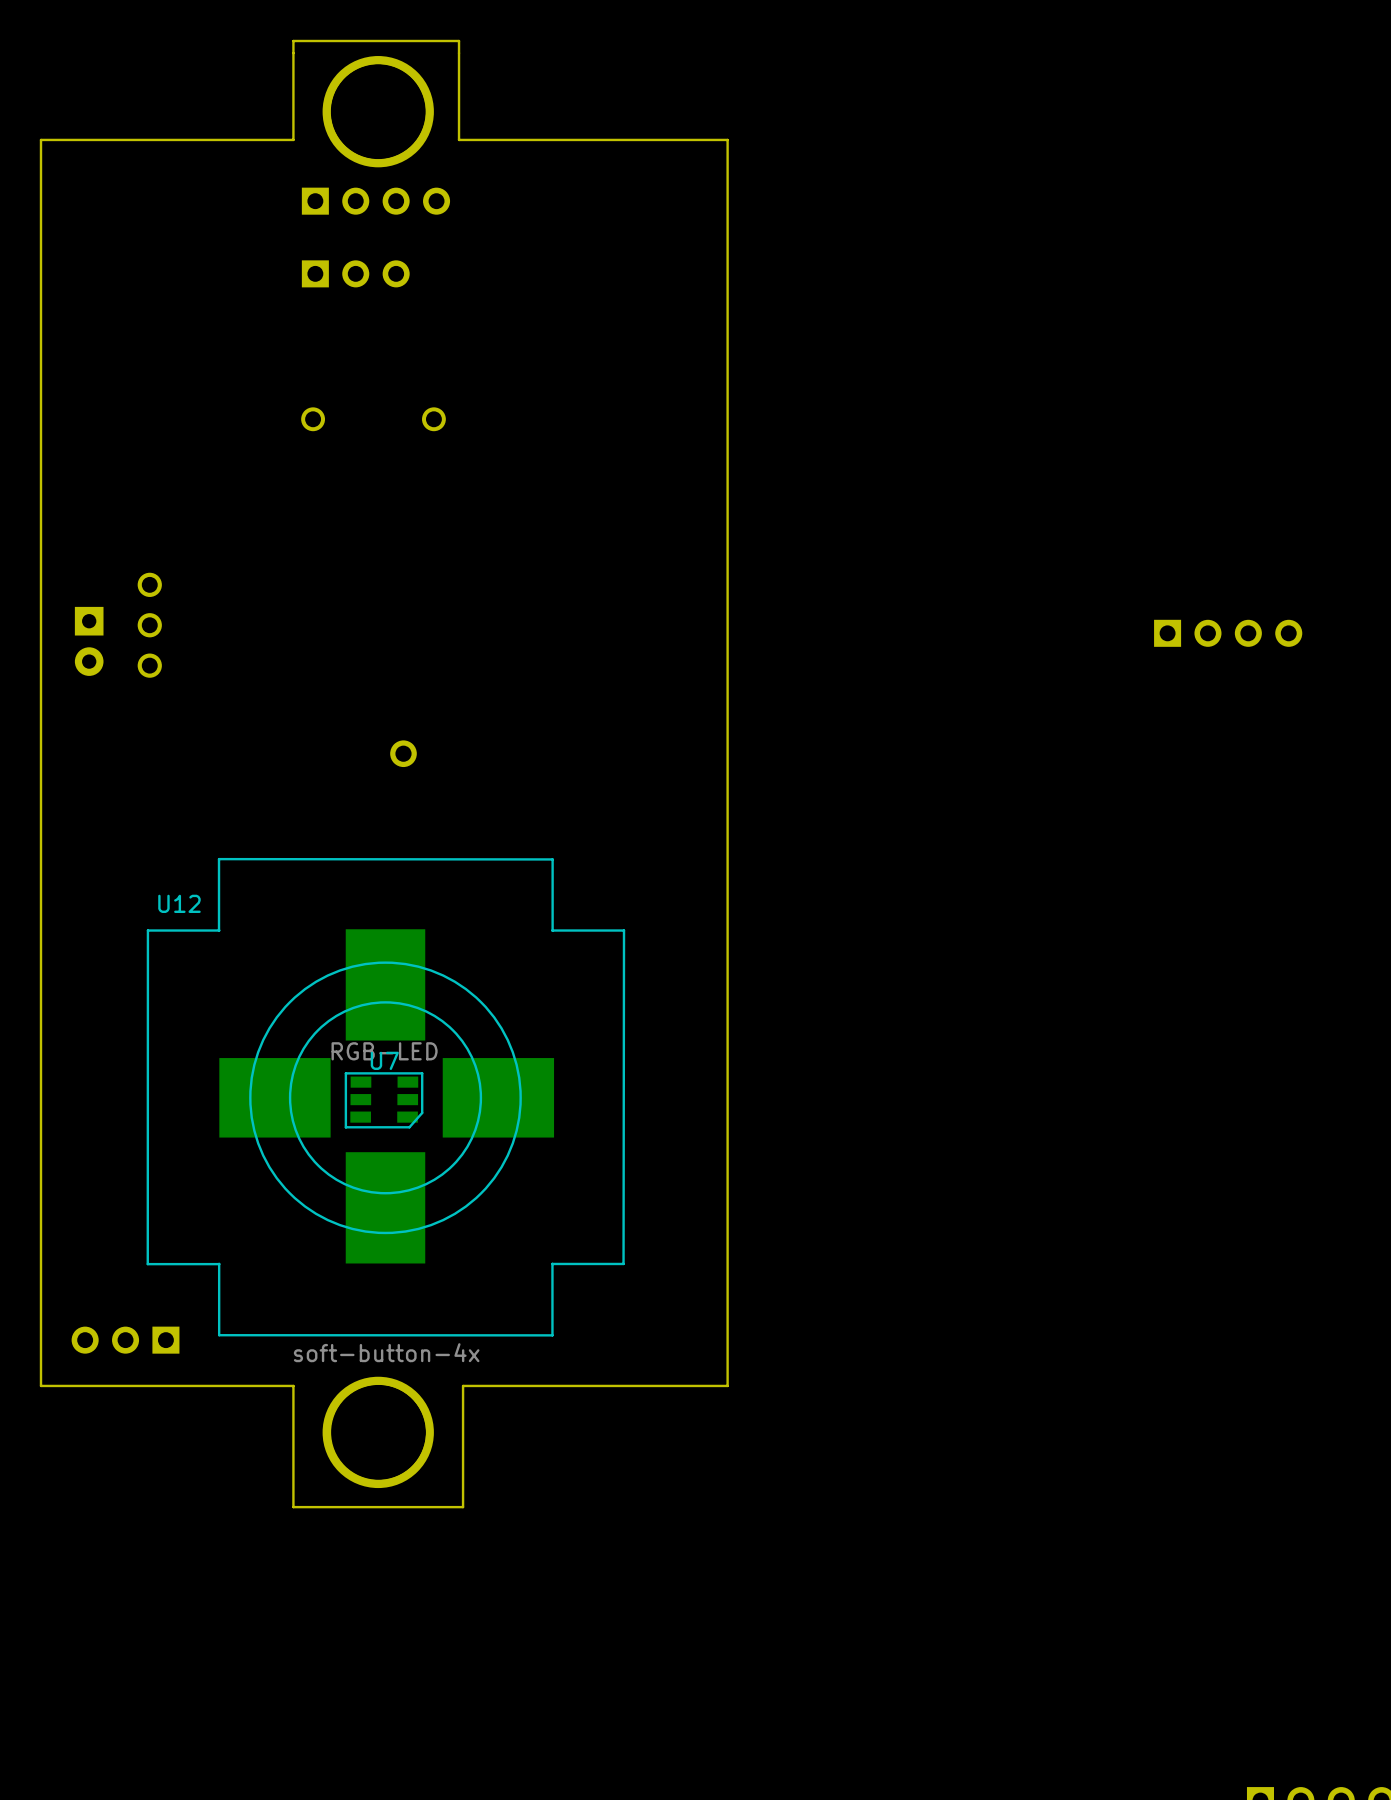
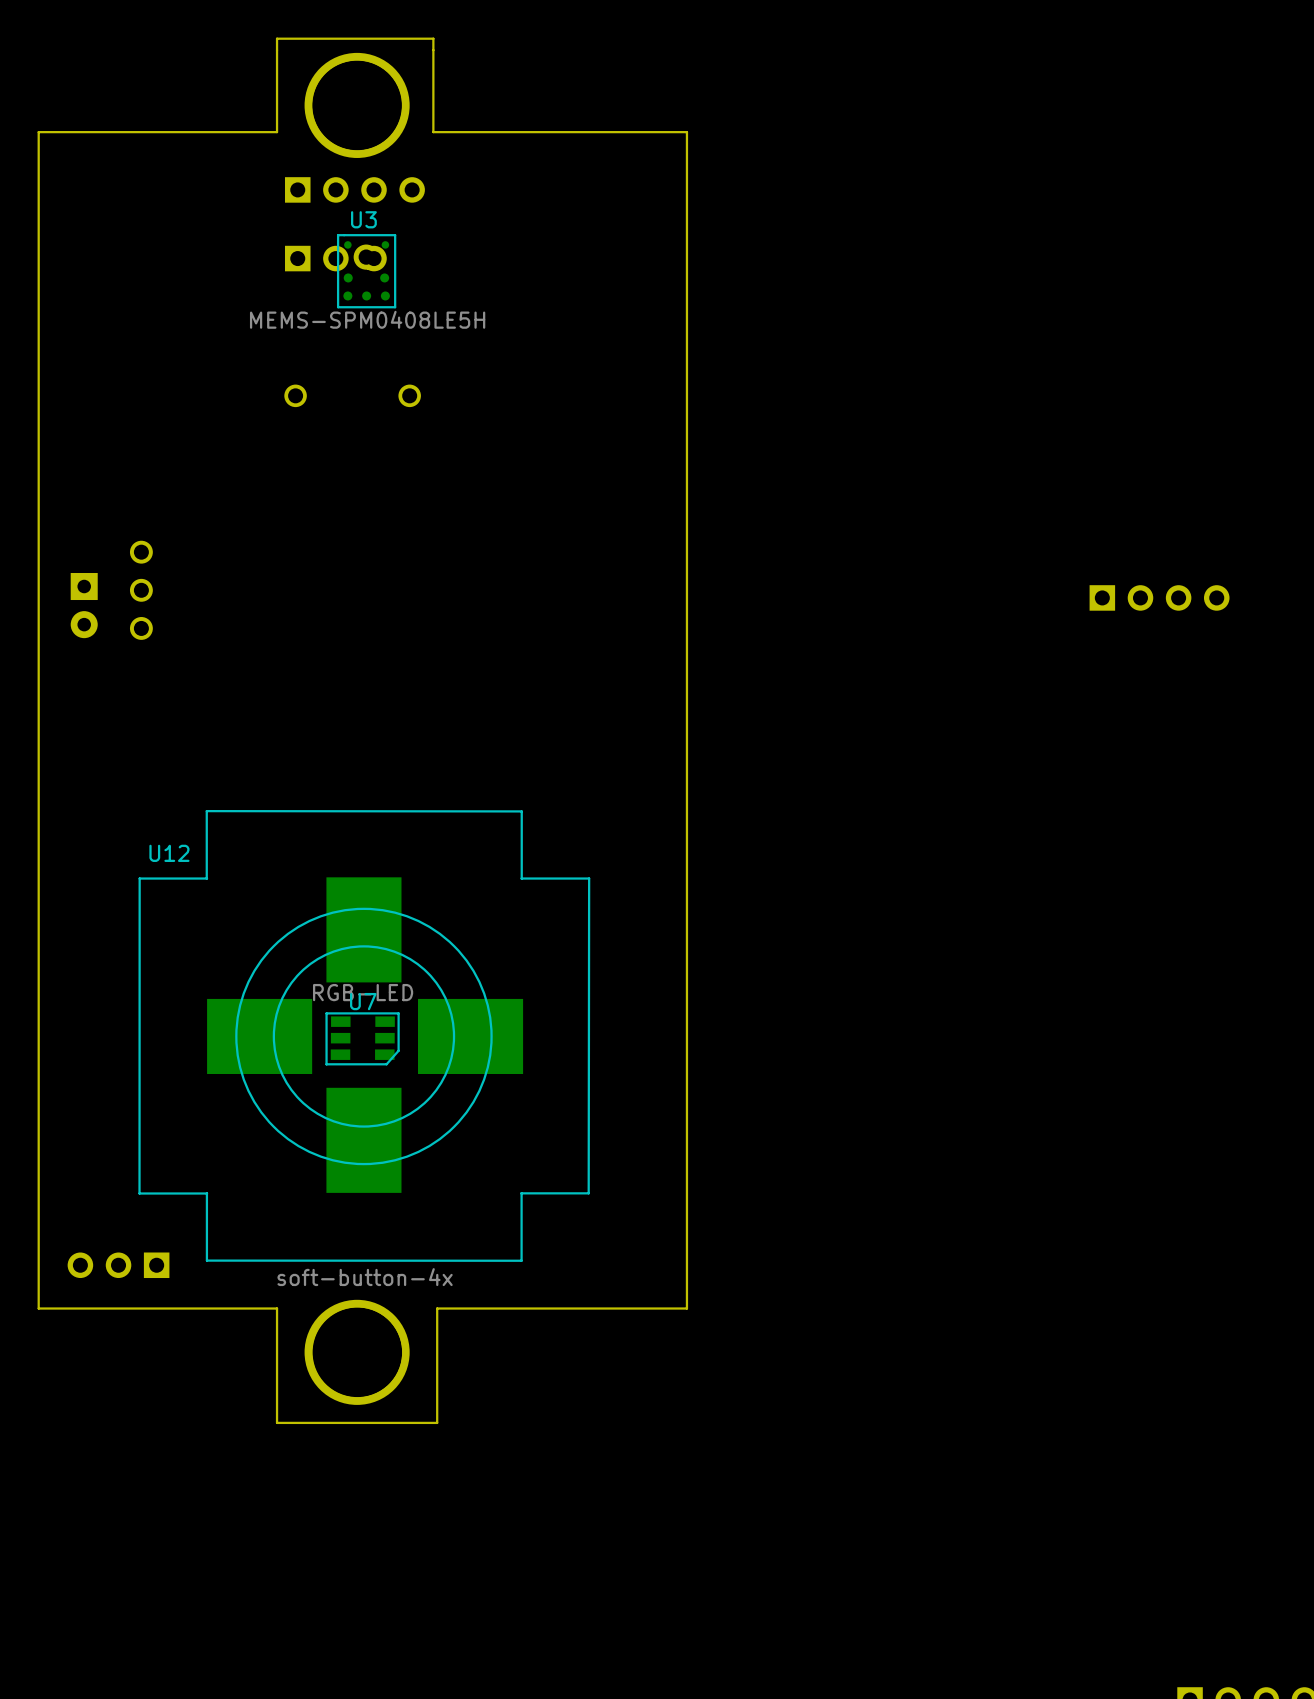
U3: none -> MEMS-SPM0408LE5H (366, 271)
part: (403, 753) -> none

